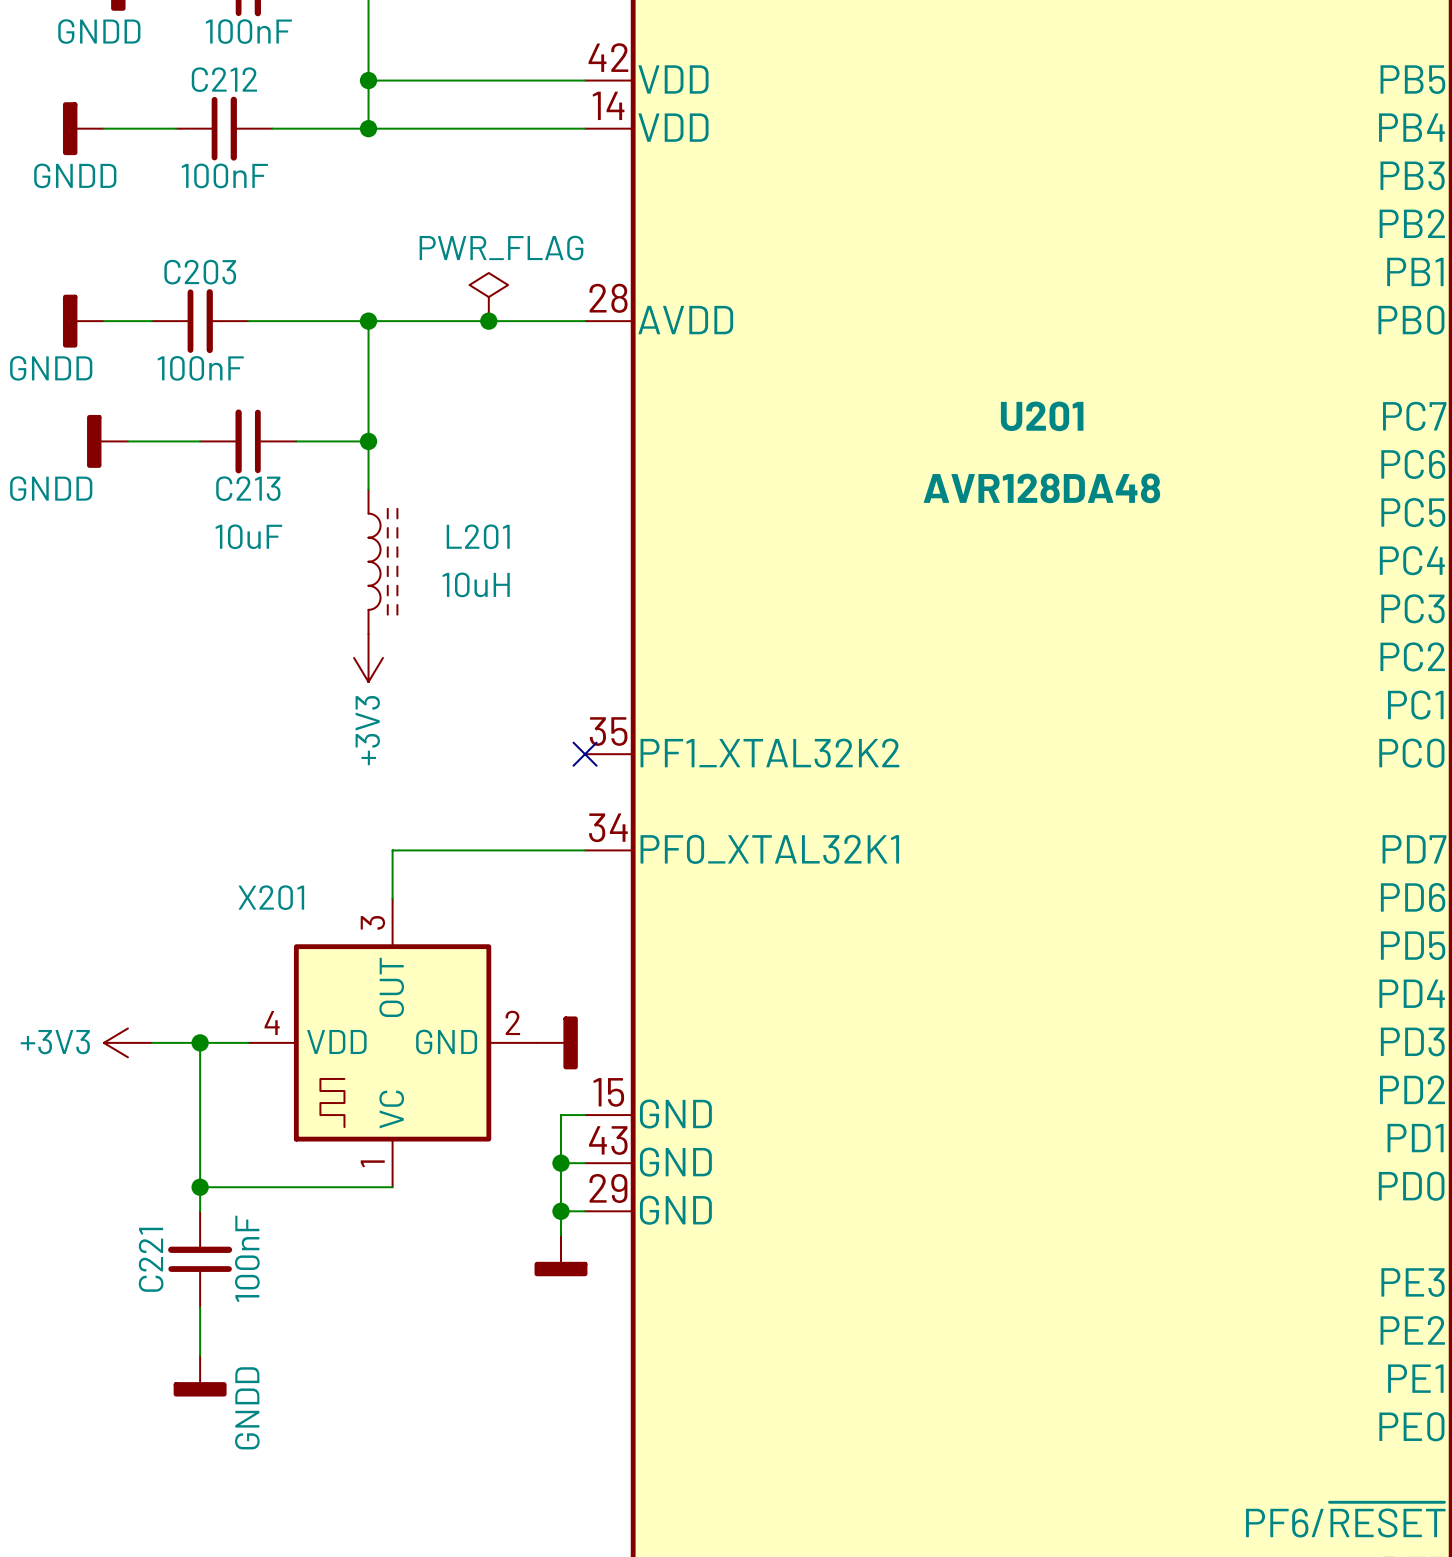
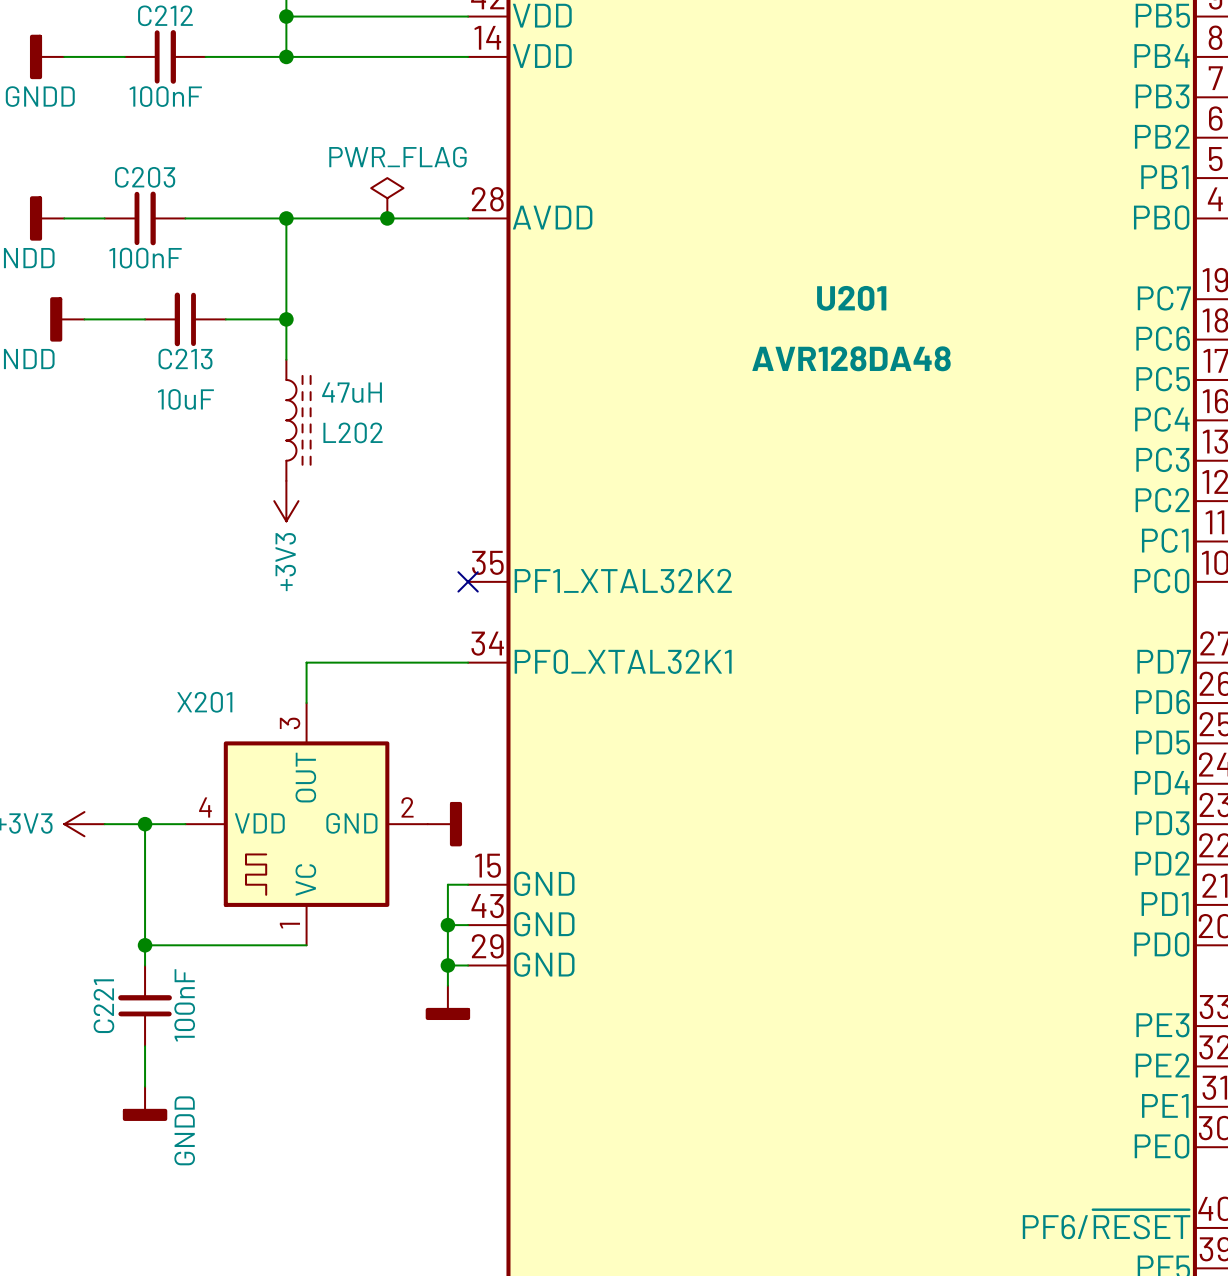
L201 name: L201 (478, 536) -> L202 (353, 432)
L201 value: 10uH (476, 584) -> 47uH (352, 392)

